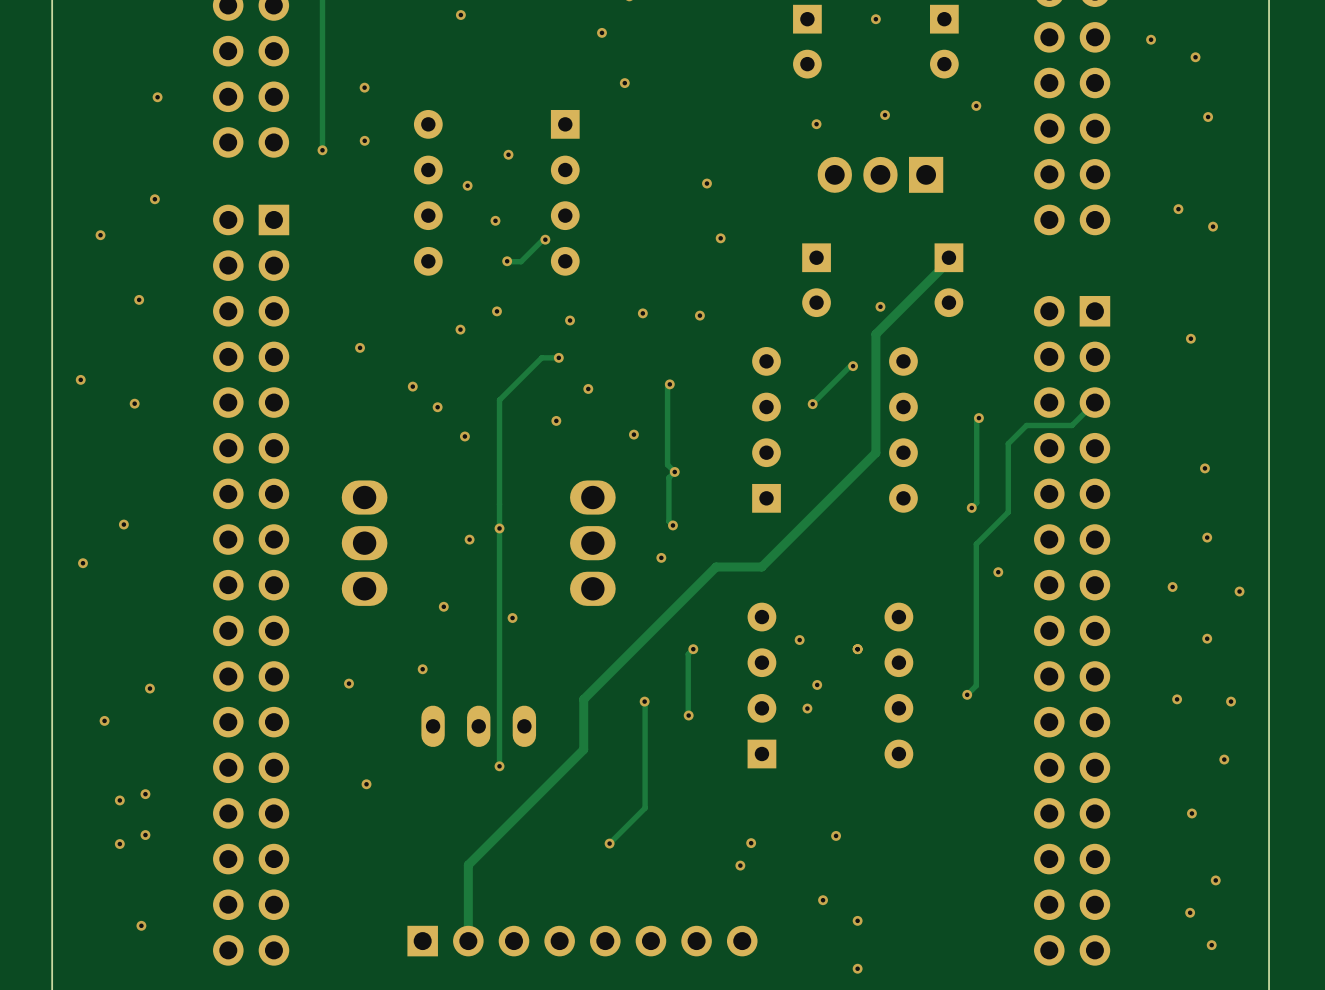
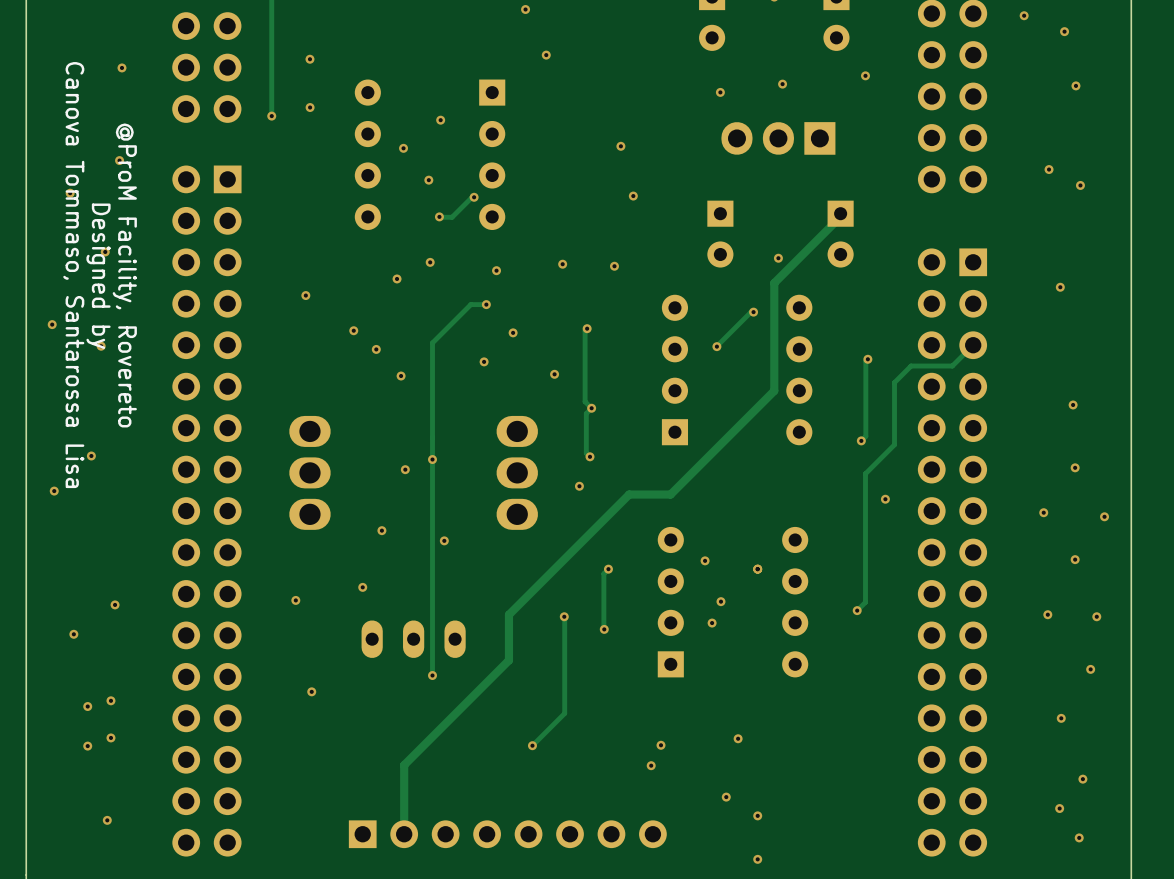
text: none -> Canova Tommaso, Santarossa Lisa (73, 275)
text: none -> @ProM Facility, Rovereto (124, 275)
text: none -> Designed by (98, 276)

